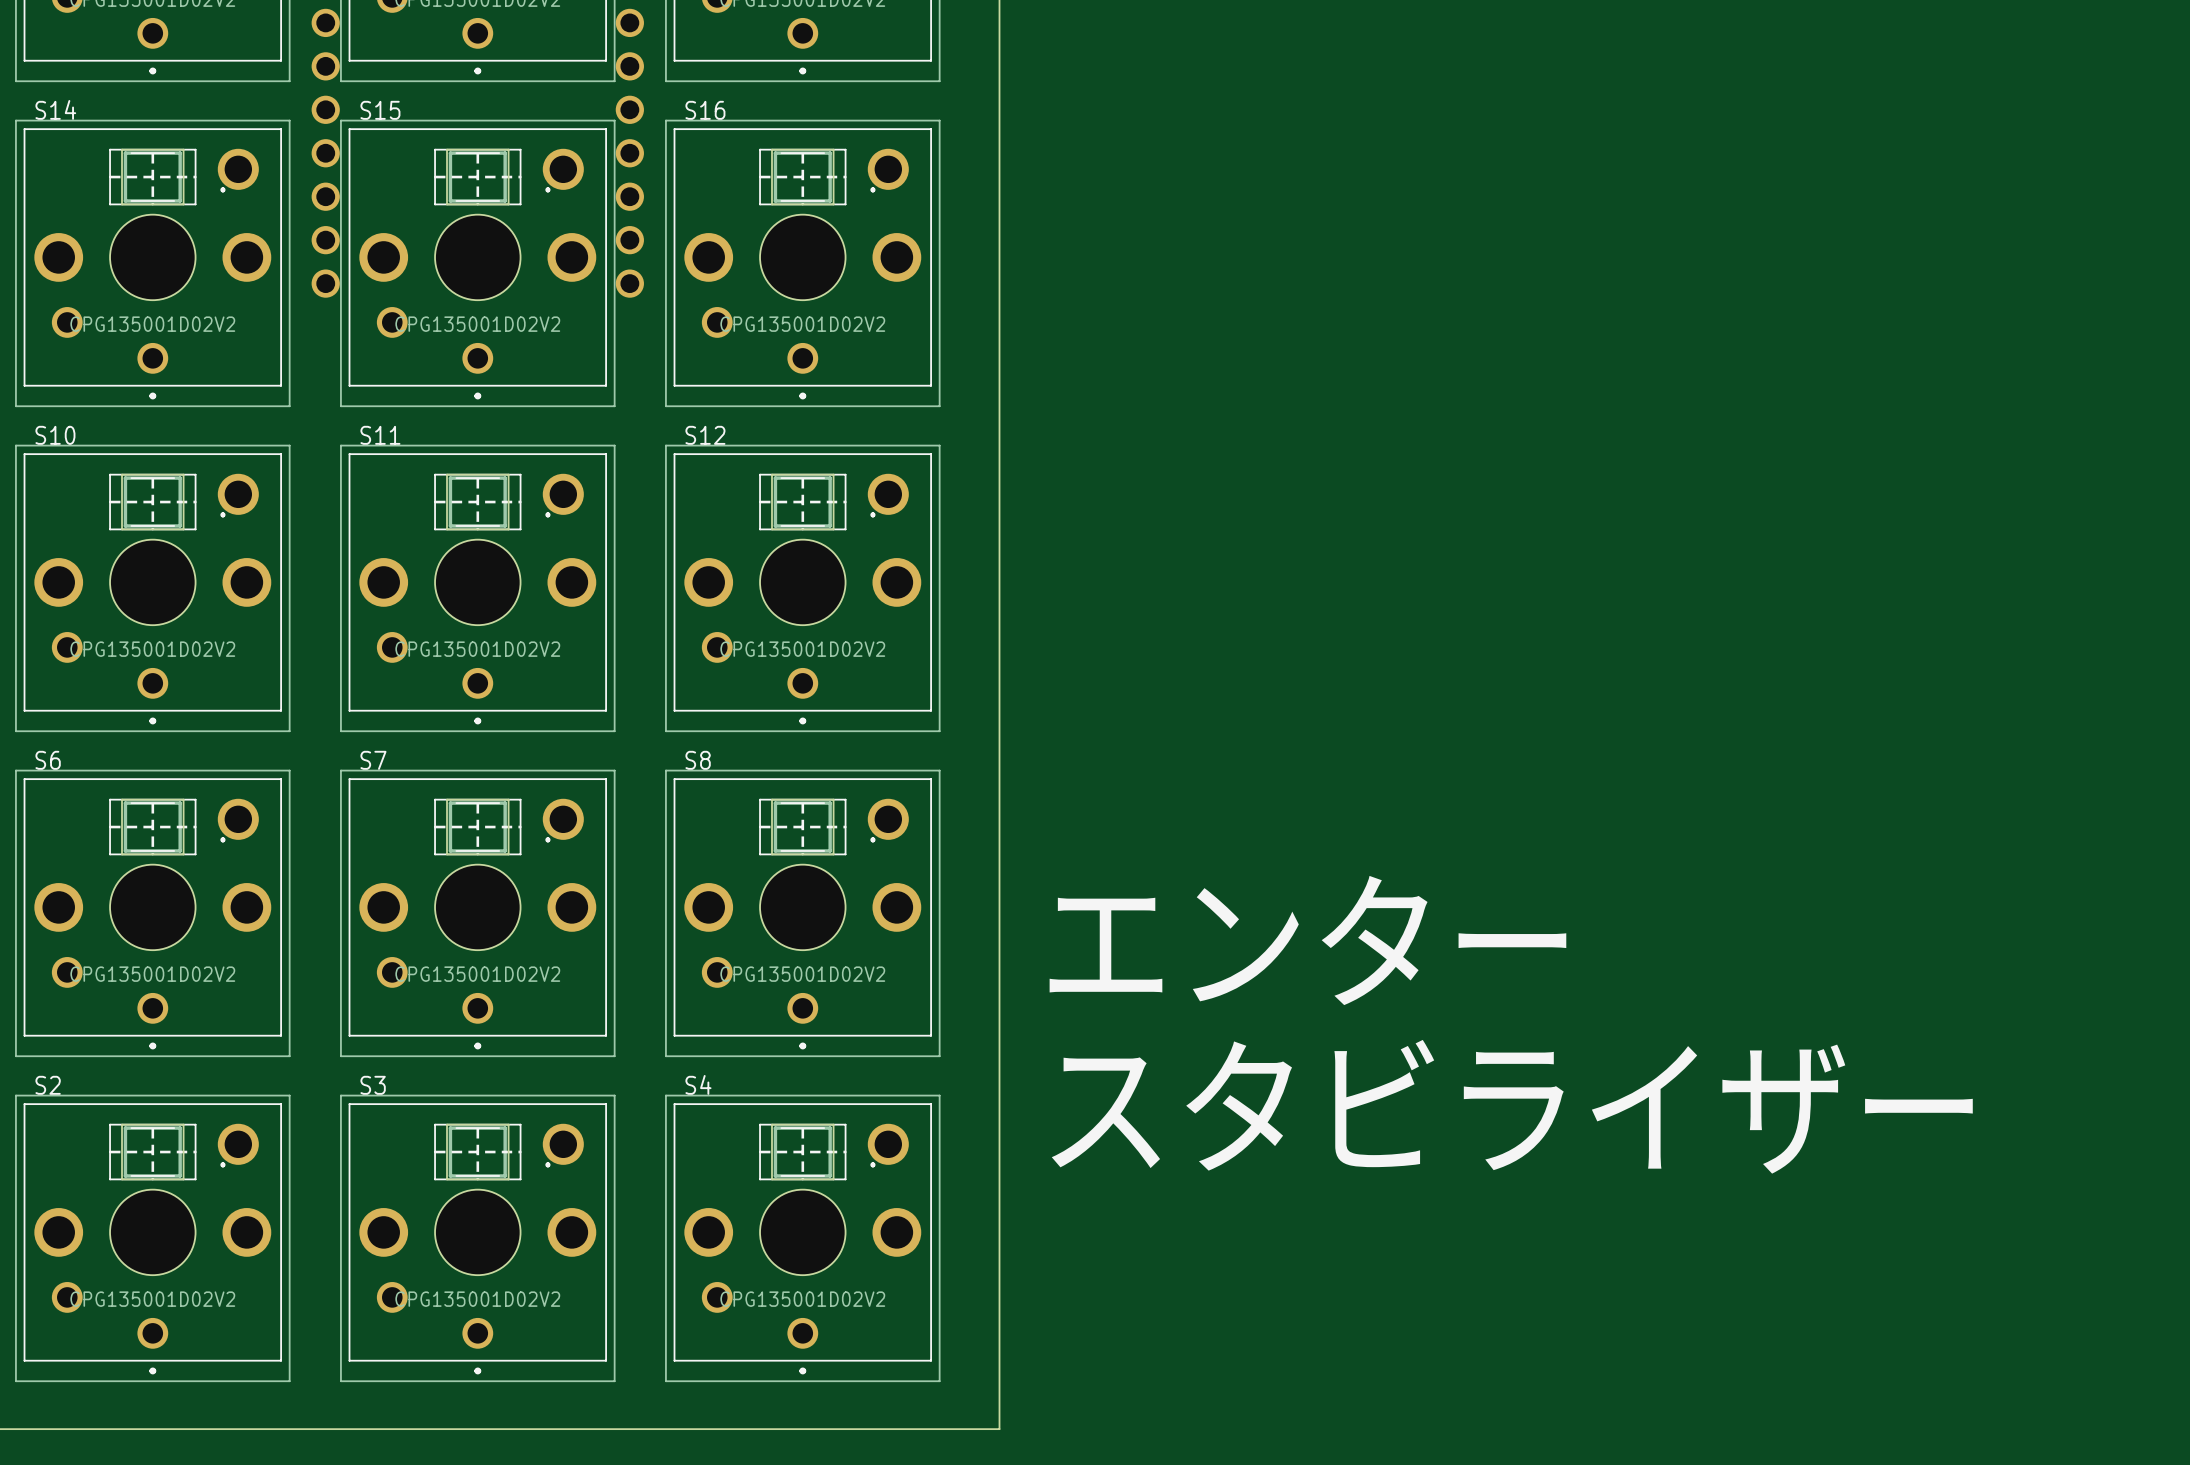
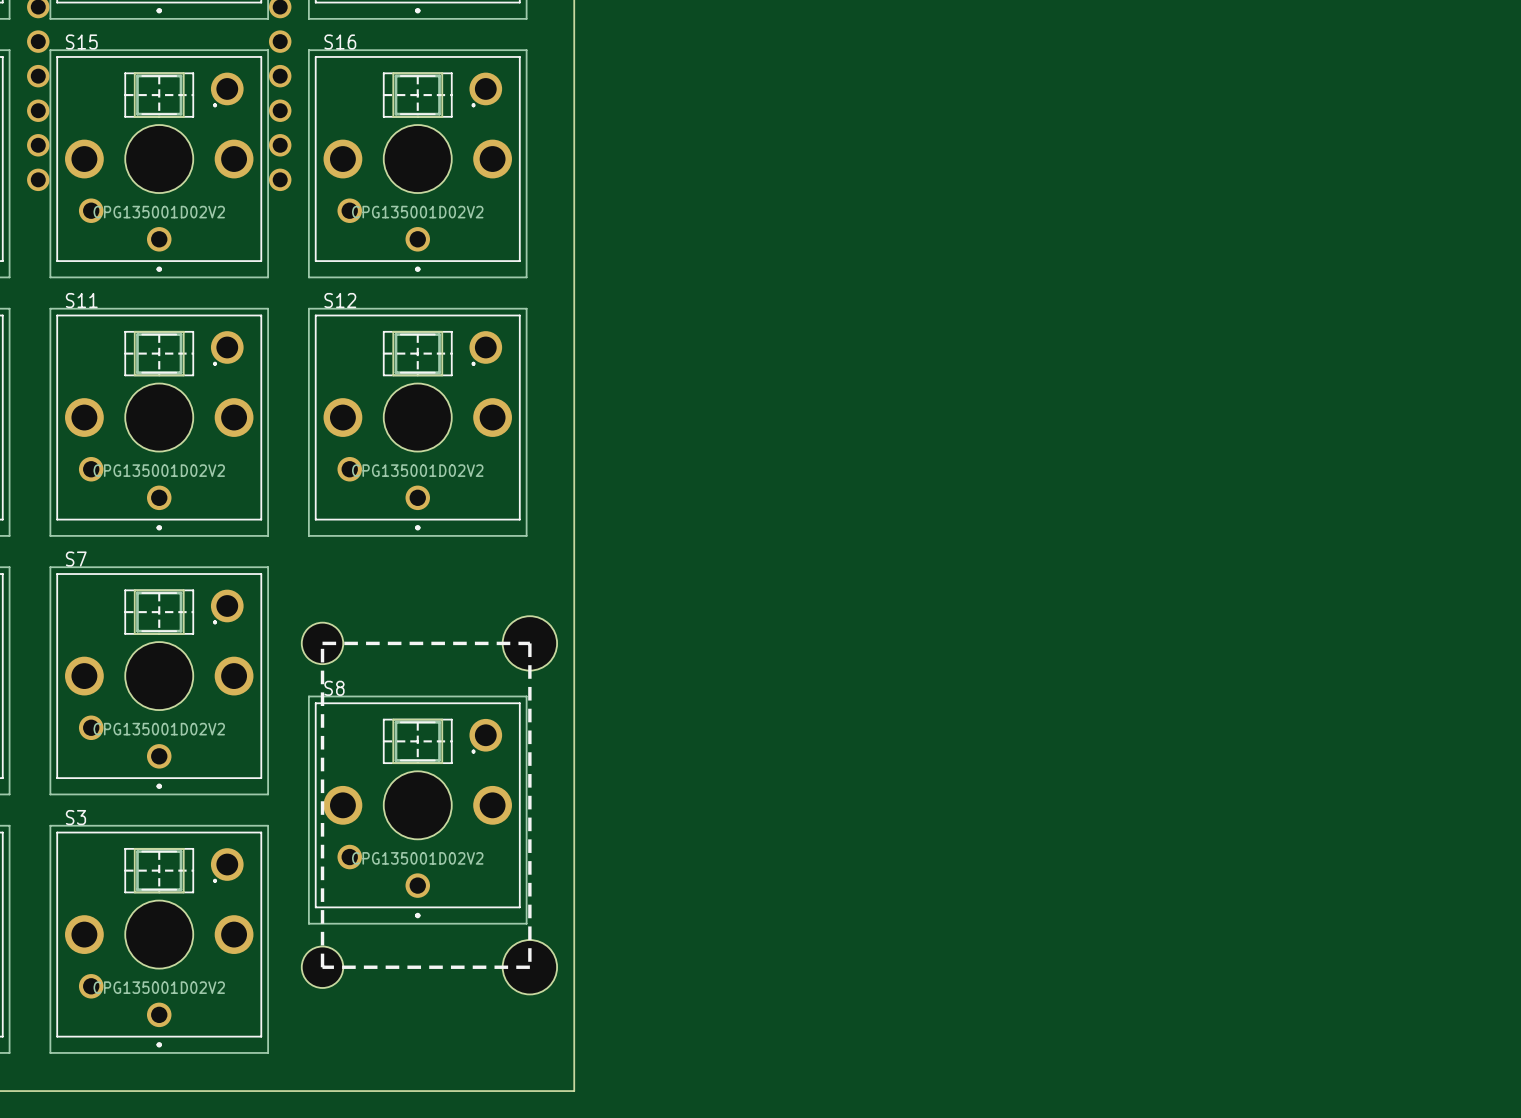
part: (823, 827) -> none
S8 position: (802, 913) -> (417, 810)
text: エンター (1307, 940) -> none
part: none -> (434, 741)
part: none -> (429, 805)
text: スタビライザー (1512, 1106) -> none
part: (823, 1152) -> none
S4: CPG135001D02V2 (802, 1238) -> none

